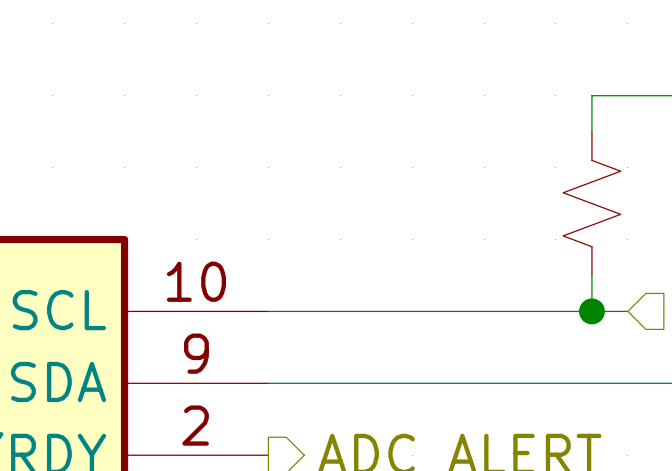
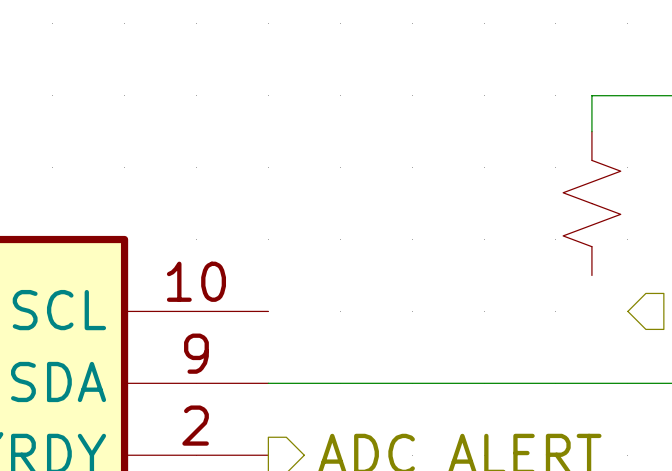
wire: (591, 275) (591, 311) -> none
wire: (268, 311) (627, 311) -> none
junction: (591, 311) -> none

